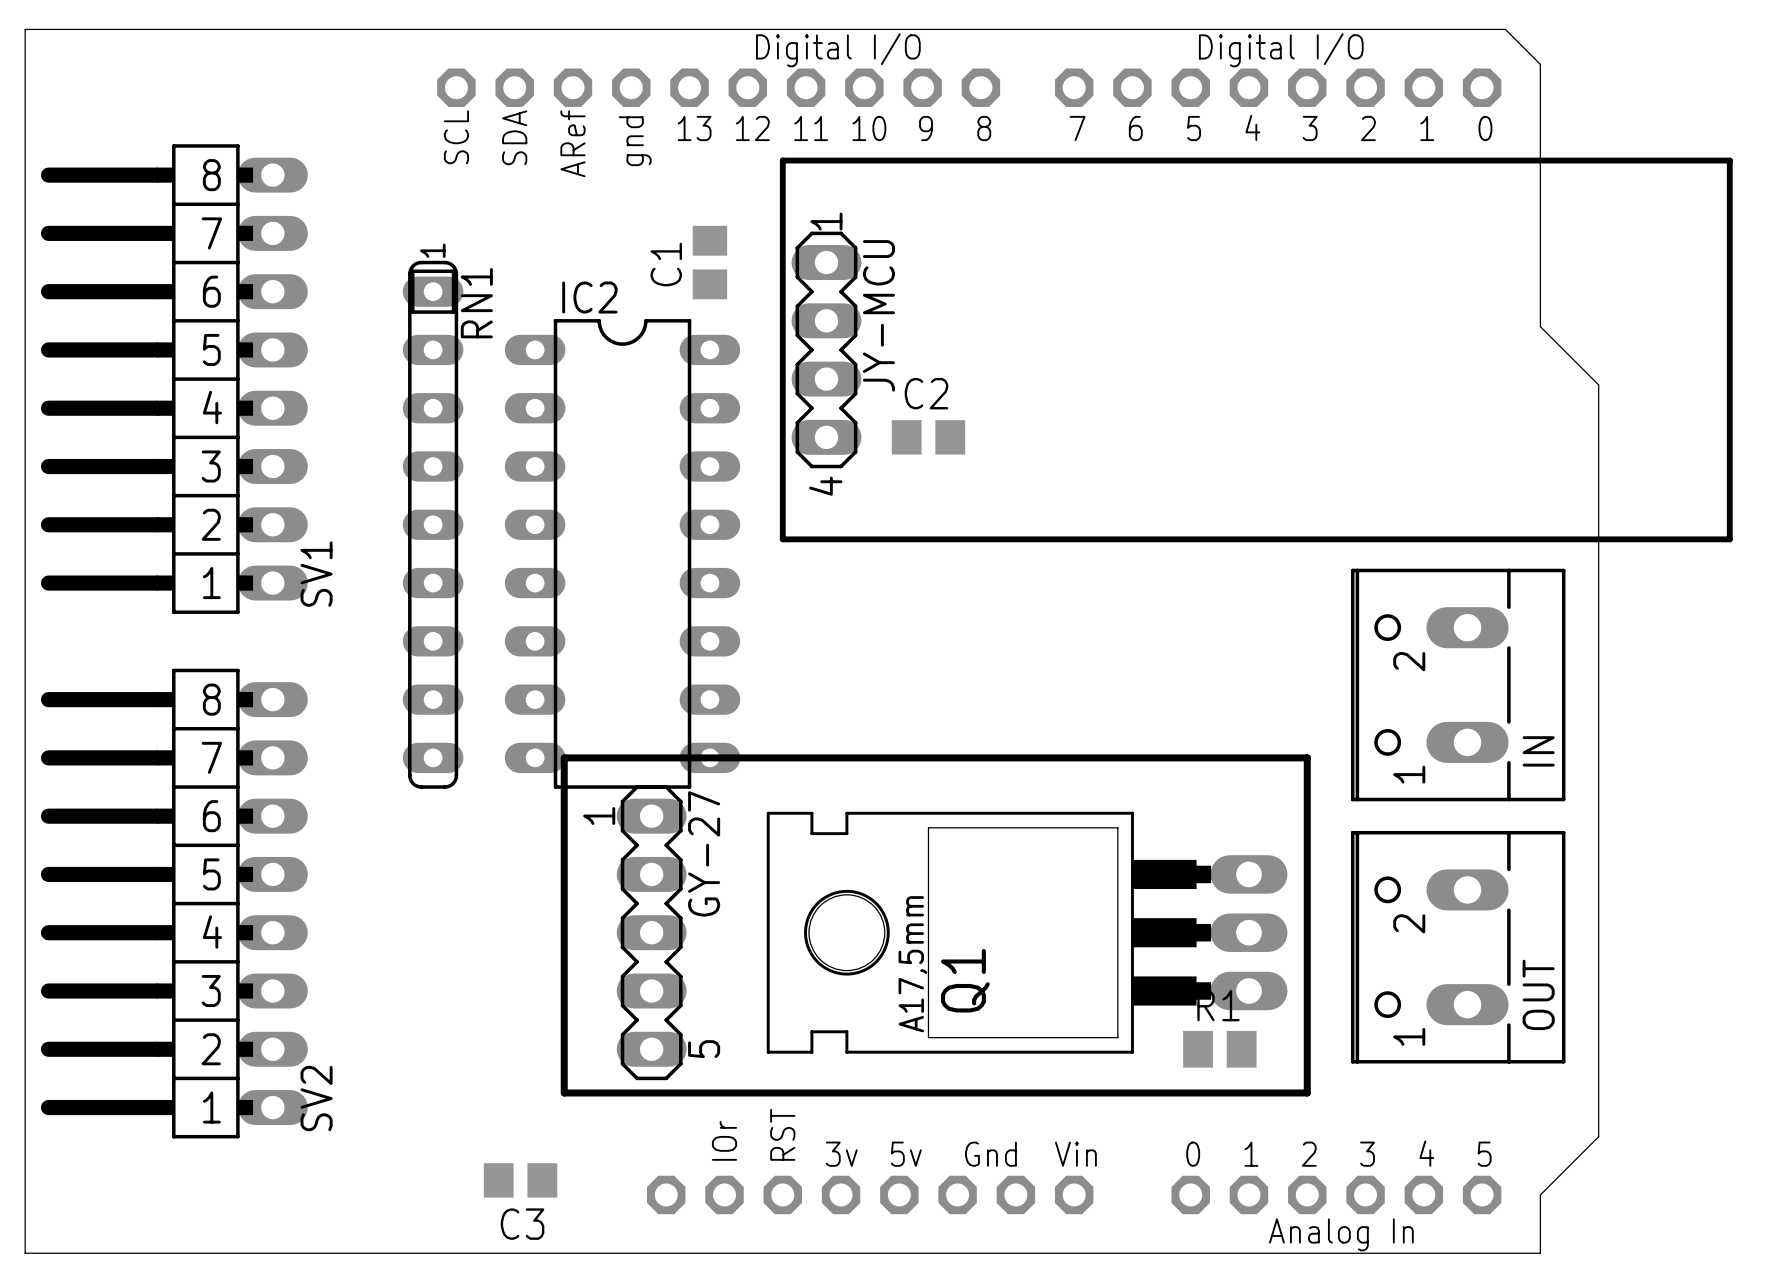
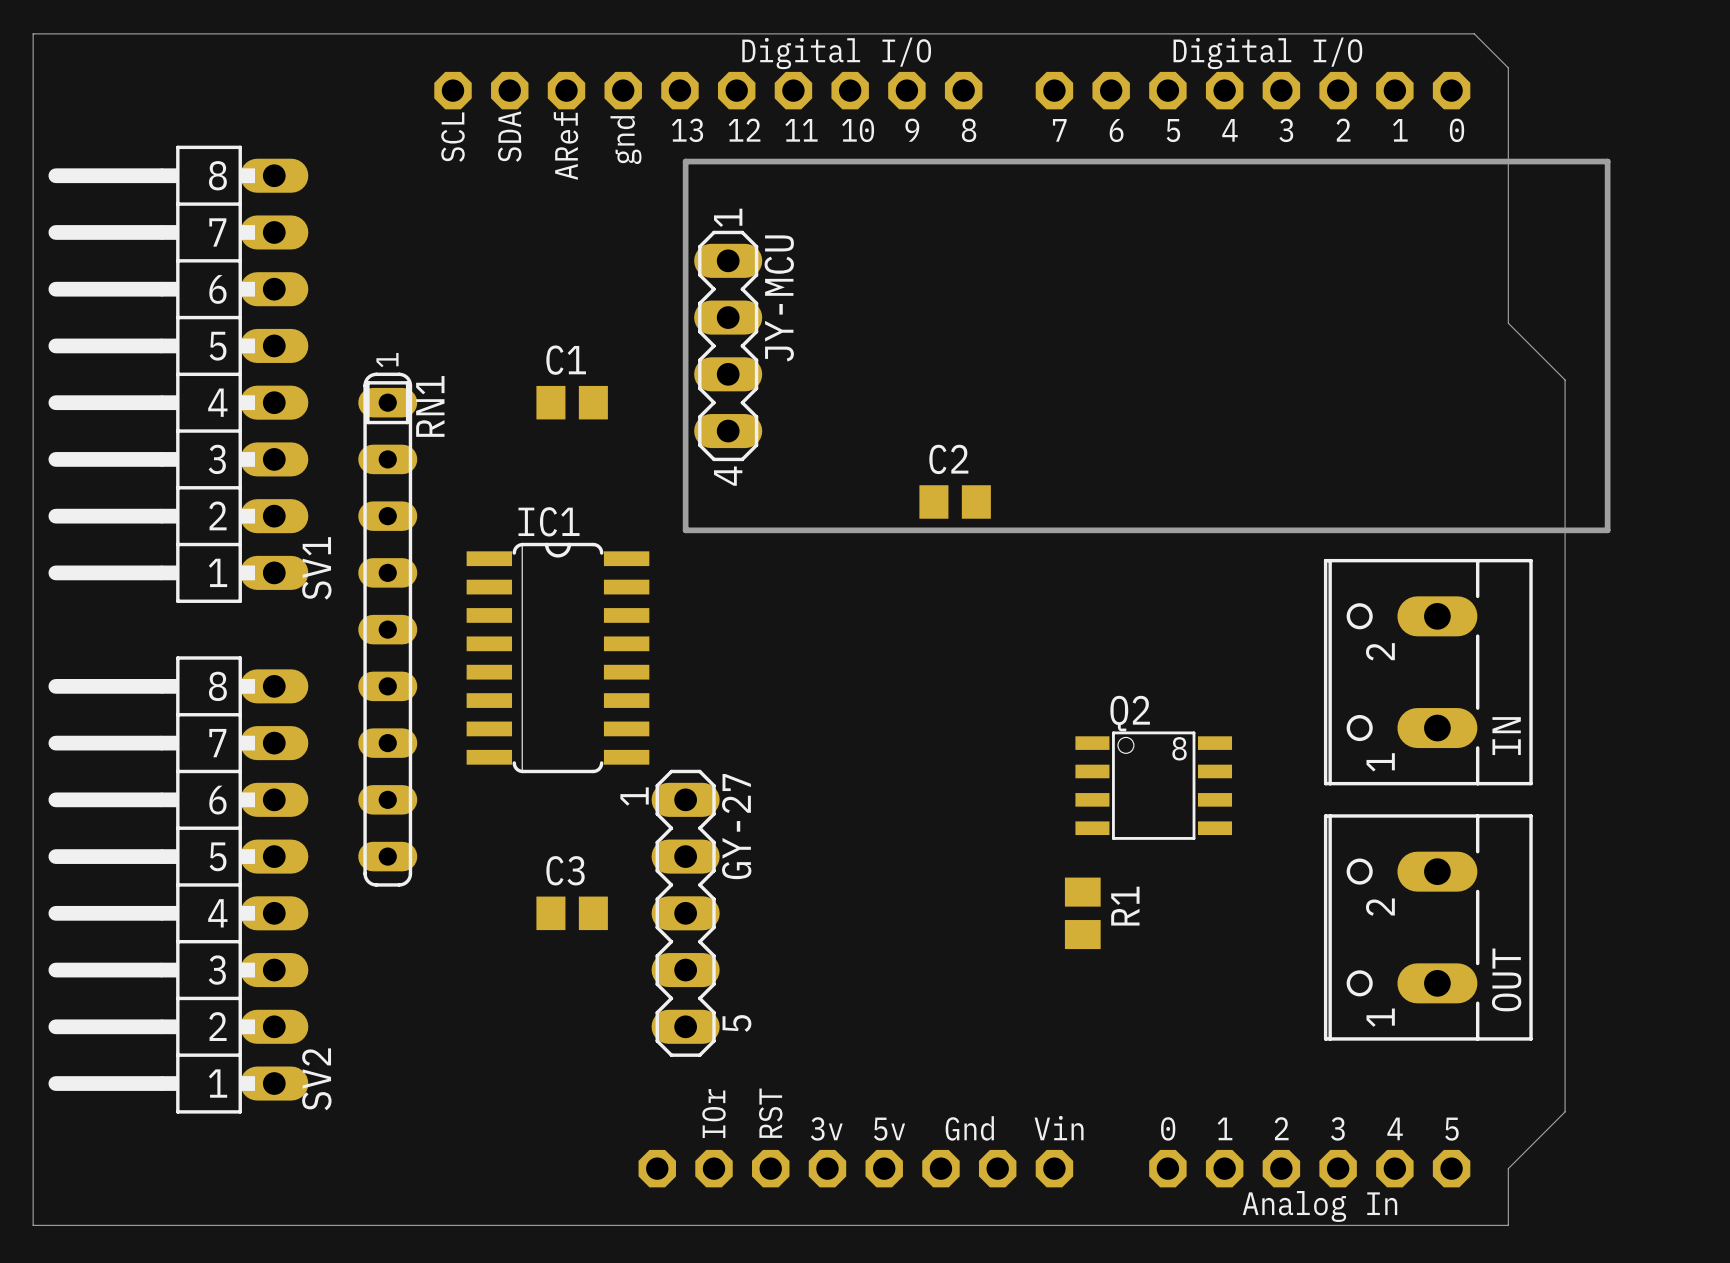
board edge: (782, 160) (782, 539) -> (770, 161) (685, 161) (685, 530) (770, 530)
board edge: (1642, 160) (1729, 160) (1729, 539) (1642, 539) -> (1607, 161) (1607, 530)
C1 rotation: 0° (709, 262) -> 90° clockwise (572, 402)
C1 position: (709, 262) -> (572, 402)
JY-MCU position: (826, 349) -> (728, 345)
C2 position: (928, 437) -> (955, 501)
RN1 position: (433, 524) -> (387, 629)
IC2: (622, 553) -> none
IC1: none -> (557, 658)
board edge: (564, 757) (1307, 757) (1307, 1092) (564, 1092) (564, 757) -> none
Q2: none -> (1153, 785)
GY-27 position: (651, 932) -> (685, 913)
Q1: (1027, 932) -> none
R1 rotation: 0° (1219, 1049) -> 90° clockwise (1082, 913)
R1 position: (1219, 1049) -> (1082, 913)
C3 position: (520, 1180) -> (572, 913)
C3 name position: C3 (522, 1224) -> C3 (565, 870)

